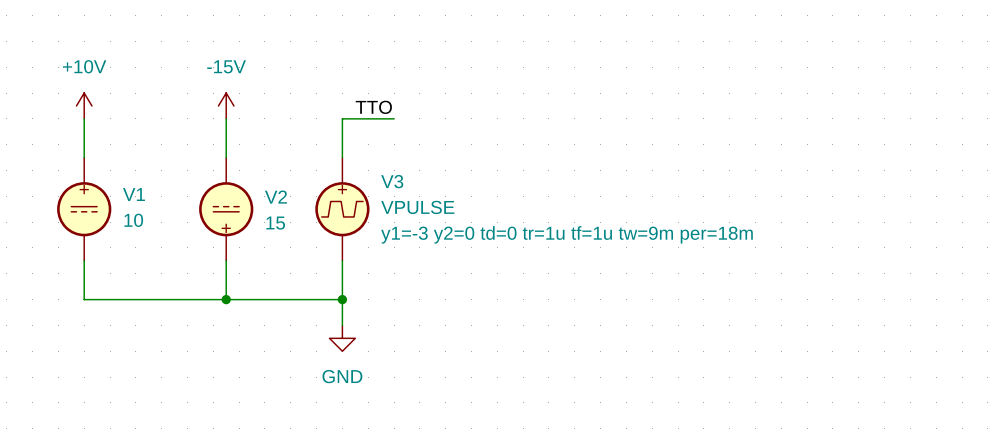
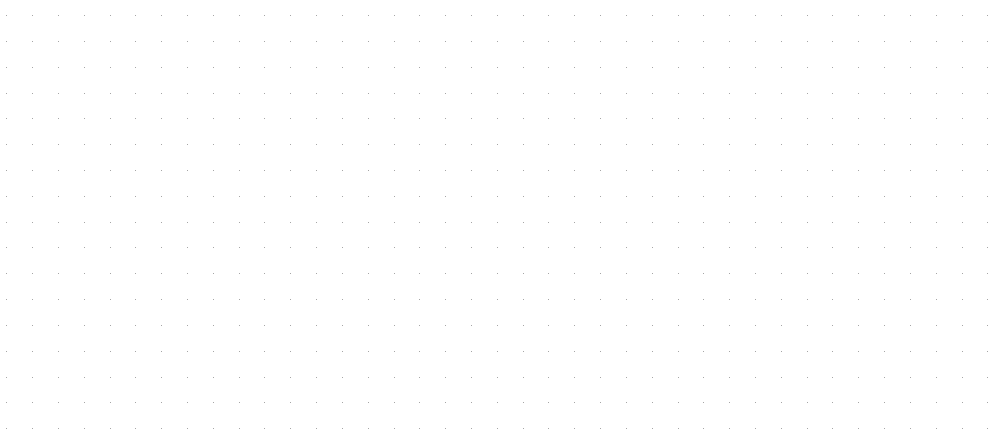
power symbol: +10V (84, 105) -> none
power symbol: -15V (226, 105) -> none
label: TTO (373, 107) -> none
wire: (84, 118) (84, 157) -> none
wire: (226, 118) (226, 157) -> none
wire: (394, 118) (342, 118) (342, 157) -> none
V1: 10 (84, 209) -> none
V2: 15 (226, 209) -> none
V3: VPULSE (342, 209) -> none
wire: (84, 260) (84, 299) (342, 299) -> none
wire: (226, 260) (226, 299) -> none
wire: (342, 260) (342, 325) -> none
junction: (226, 299) -> none
junction: (342, 299) -> none
power symbol: GND (342, 338) -> none

